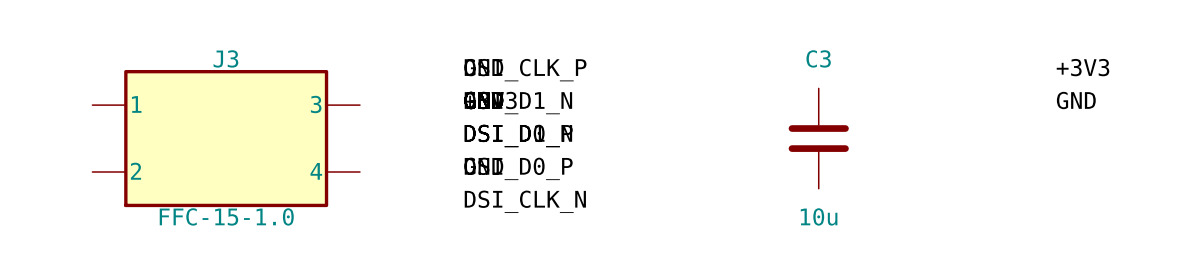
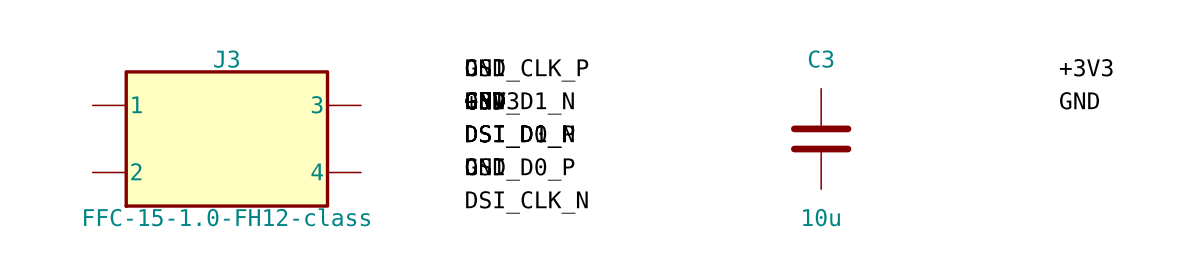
J3 value: FFC-15-1.0 (226, 216) -> FFC-15-1.0-FH12-class (227, 217)

